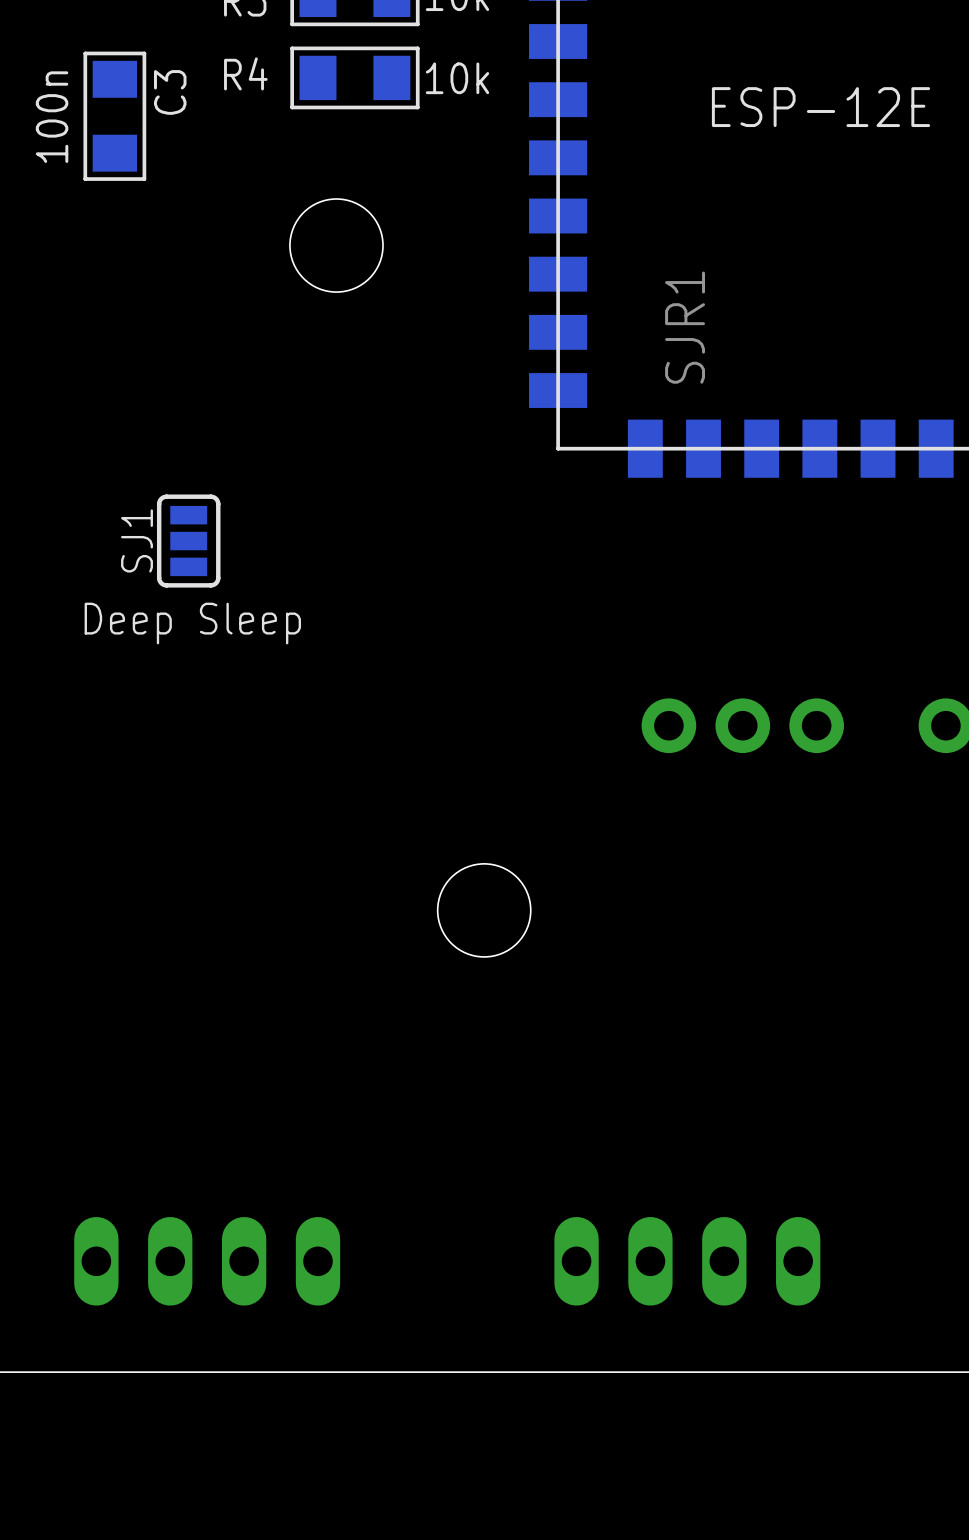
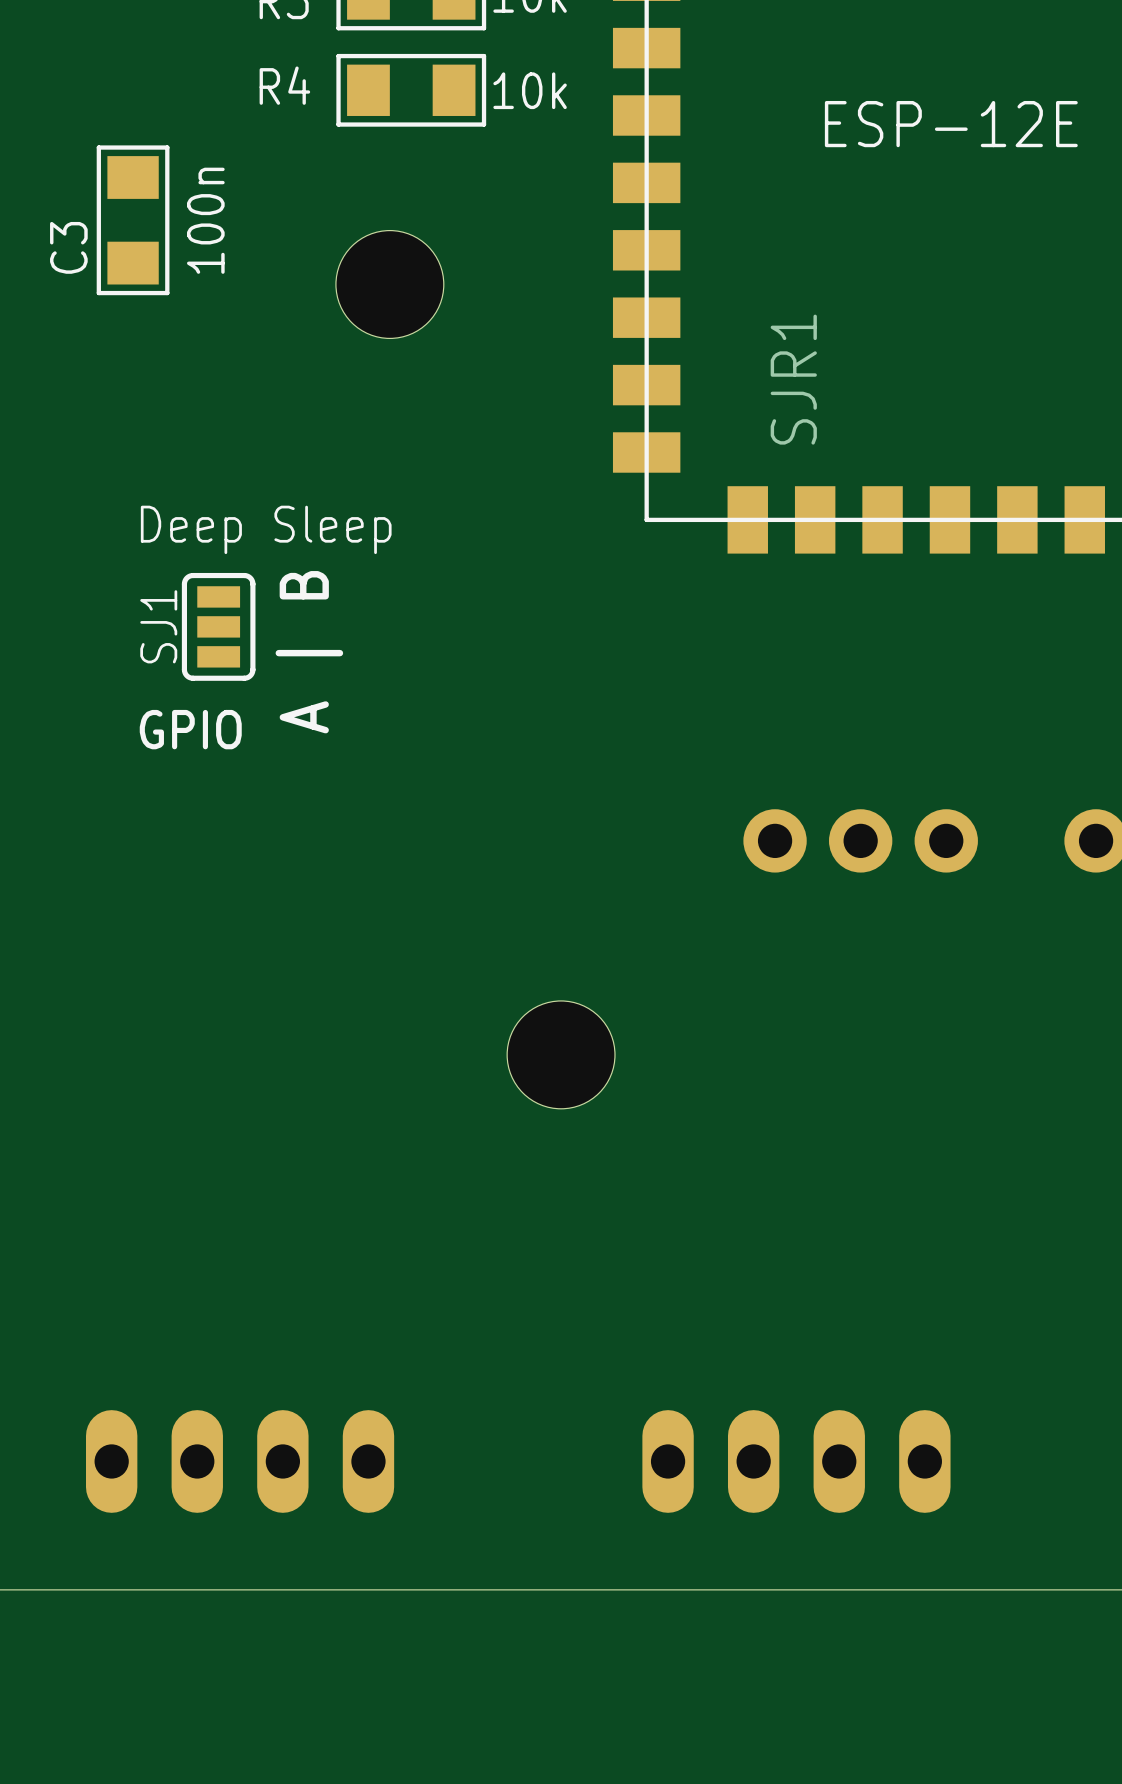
C3 name position: C3 (170, 92) -> C3 (68, 247)
C3 position: (114, 116) -> (133, 220)
C3 value position: 100n (52, 117) -> 100n (205, 220)
text: none -> A | B (309, 652)
SJ1 value position: Deep Sleep (192, 623) -> Deep Sleep (266, 529)
text: none -> GPIO (190, 729)

